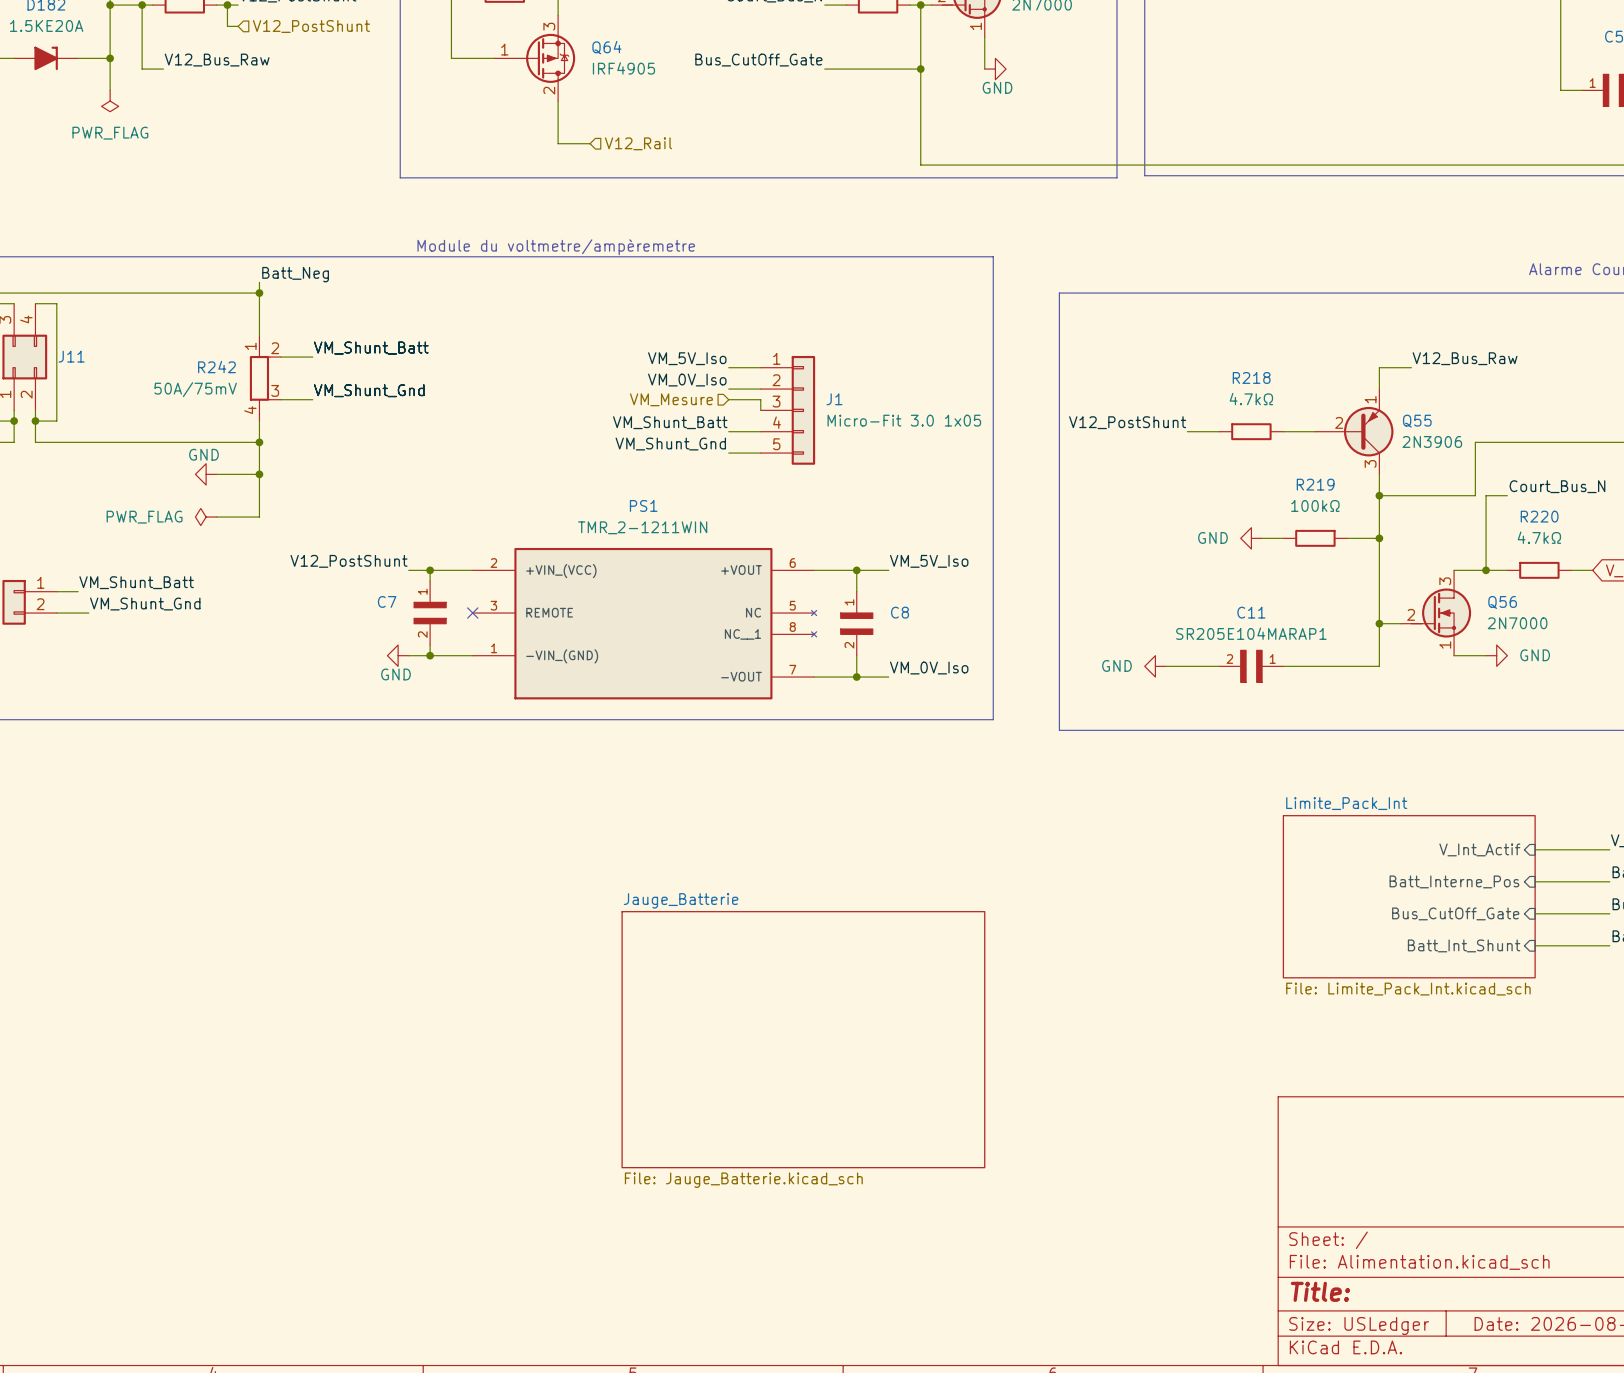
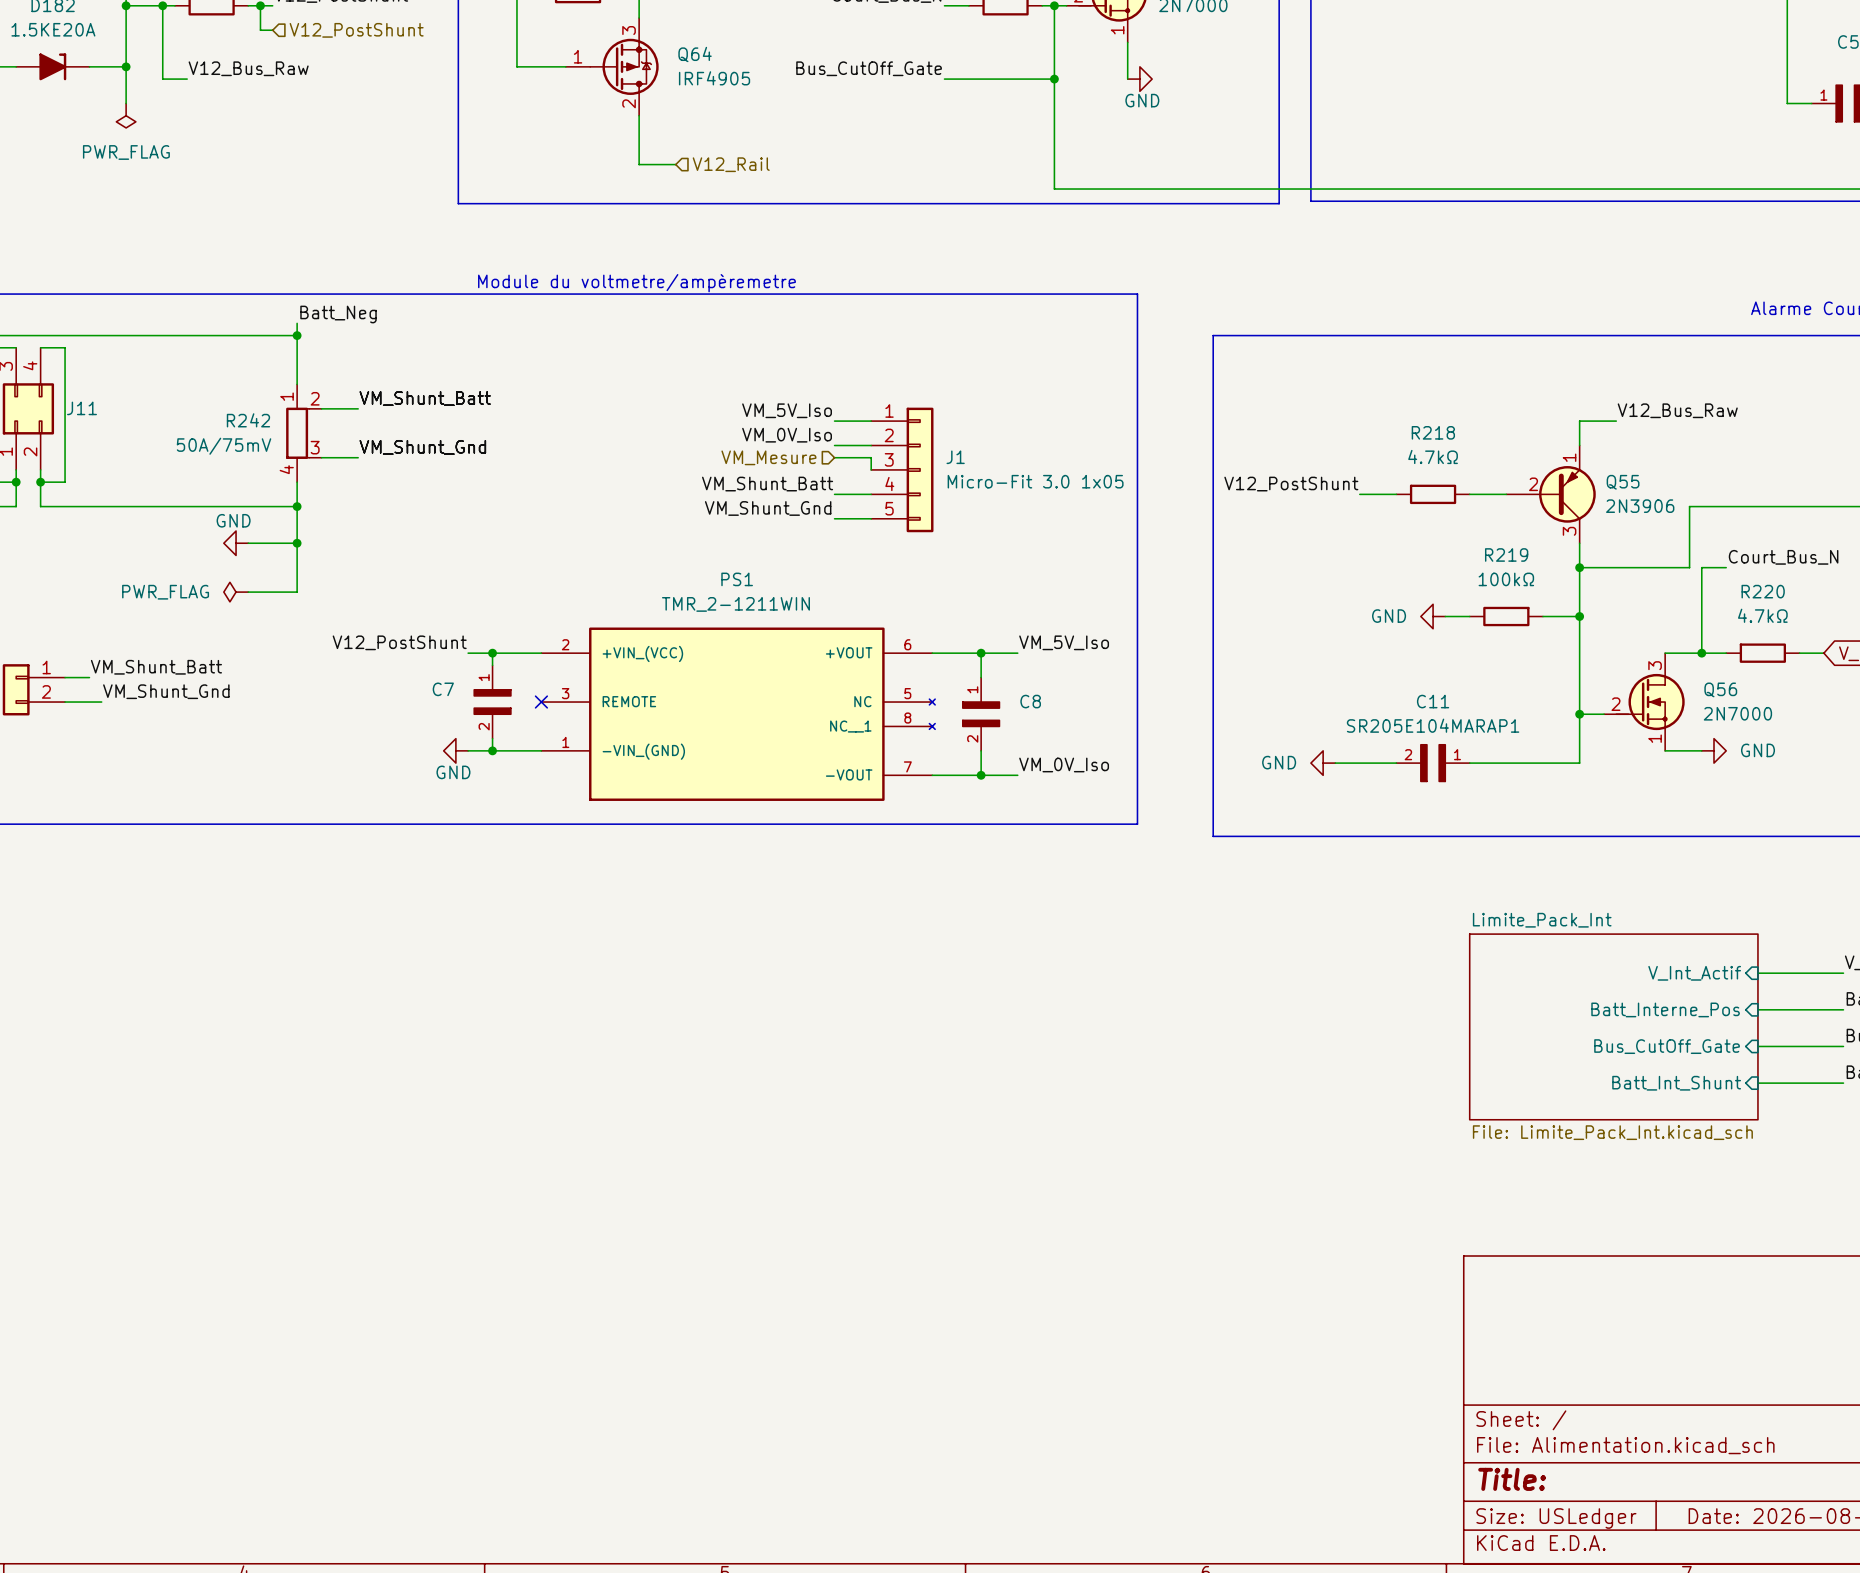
sheet Jauge_Batterie: File: Jauge_Batterie.kicad_sch (803, 1039) -> none

